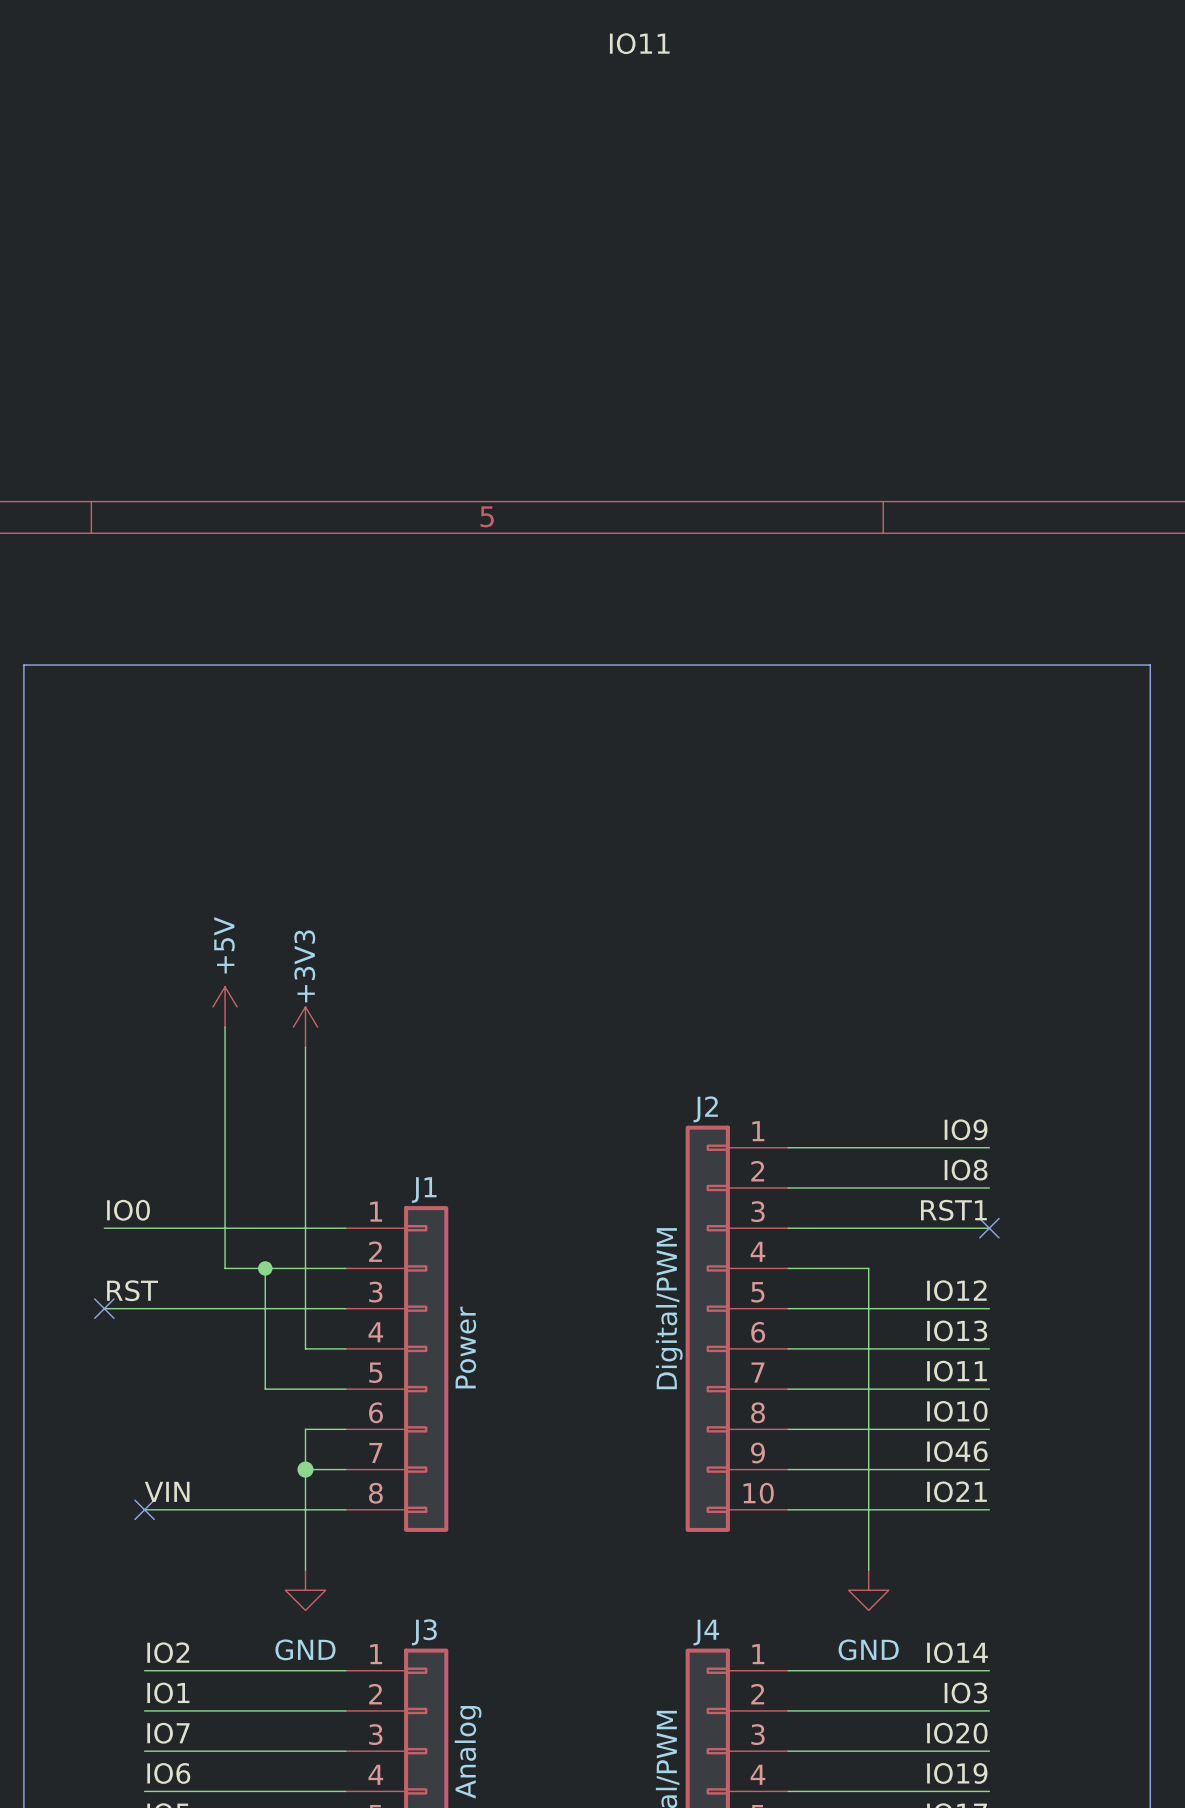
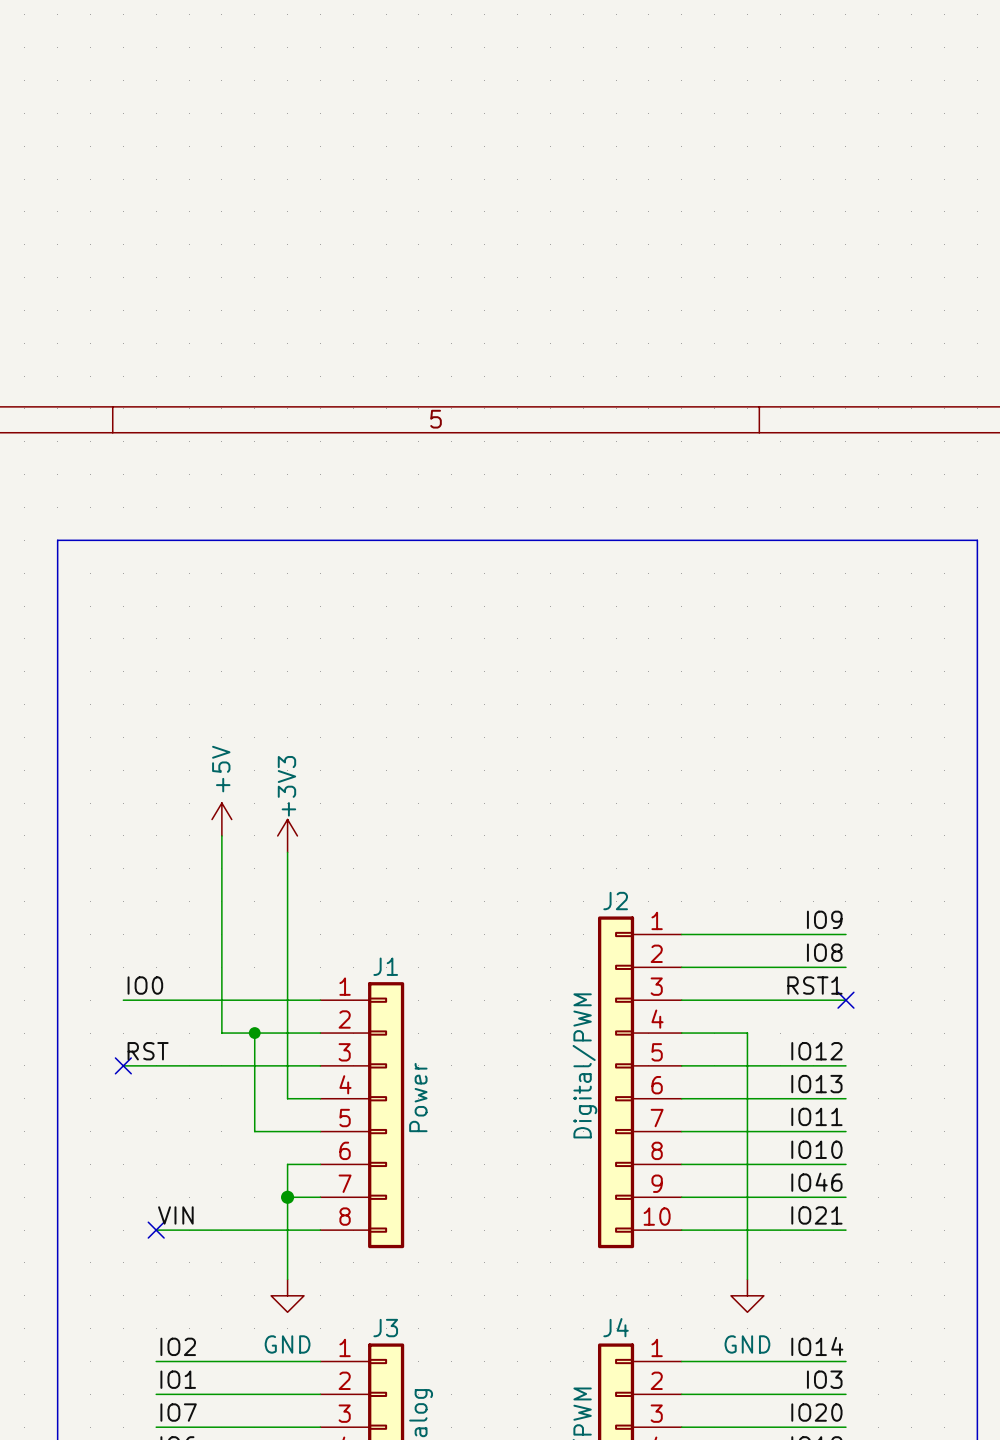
label: IO11 (639, 43) -> none

